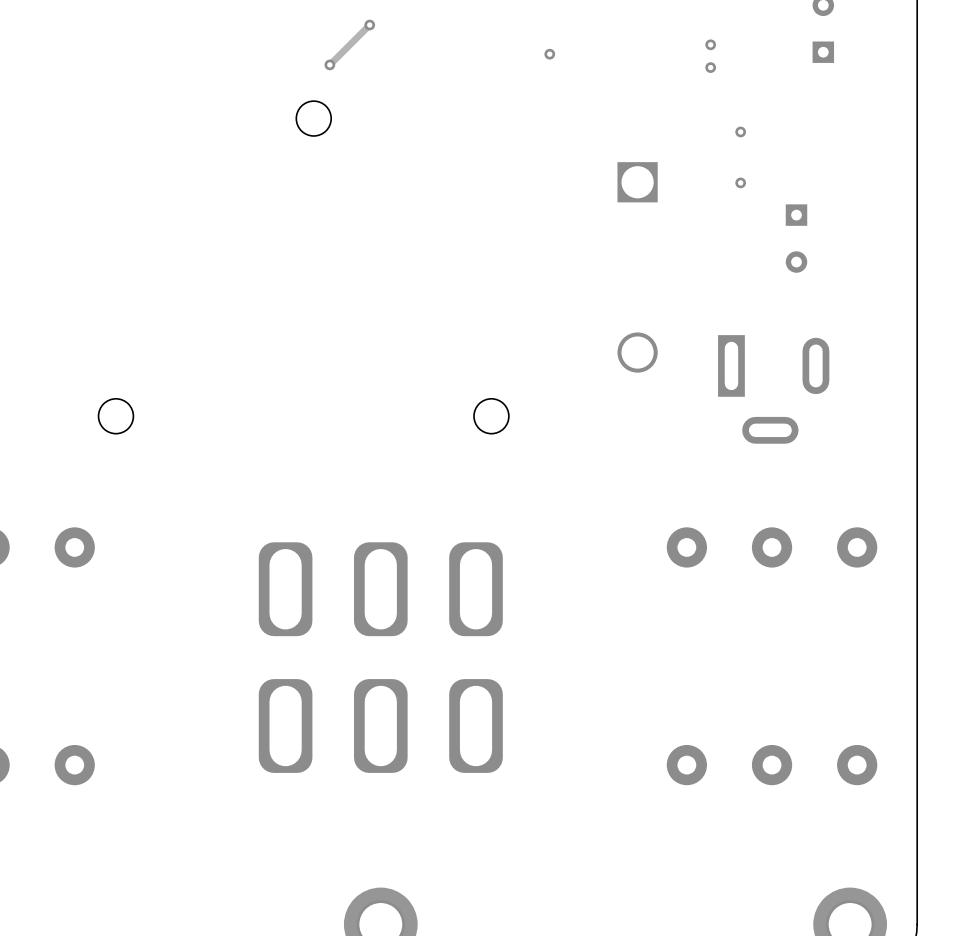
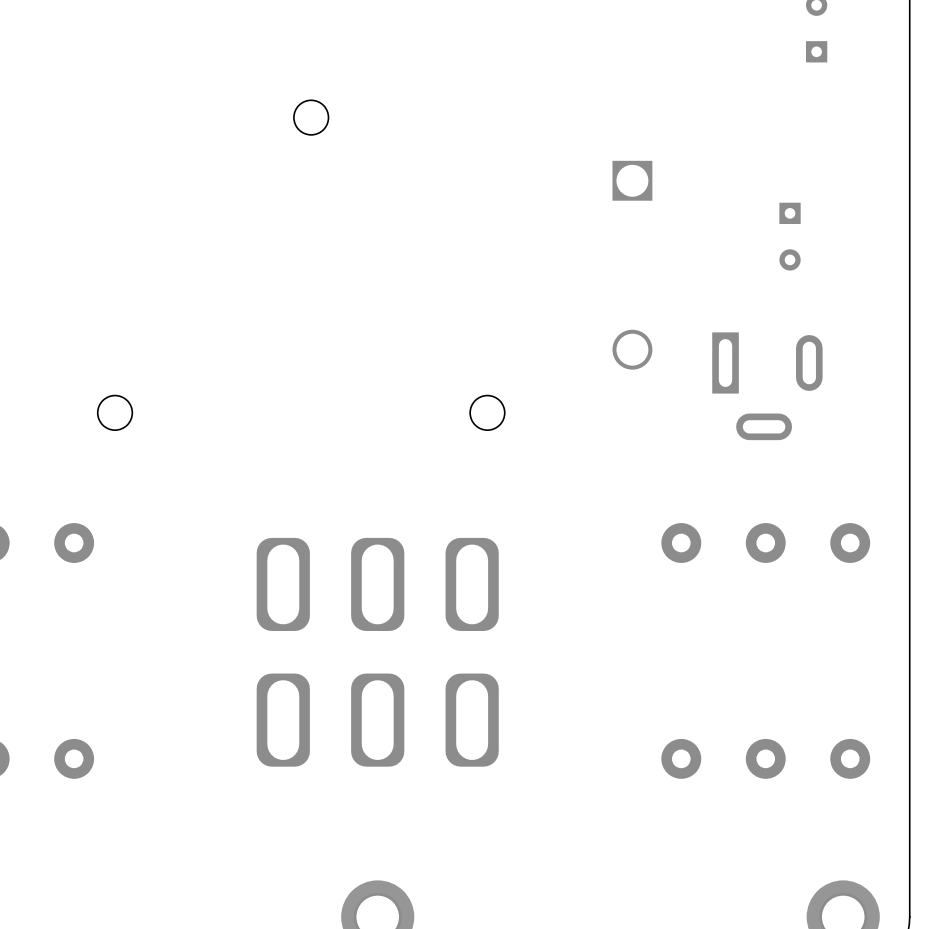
via: (369, 25) -> none
track: (370, 25) (329, 64) -> none
via: (710, 44) -> none
via: (549, 54) -> none
via: (329, 64) -> none
via: (710, 67) -> none
via: (740, 131) -> none
via: (740, 182) -> none

